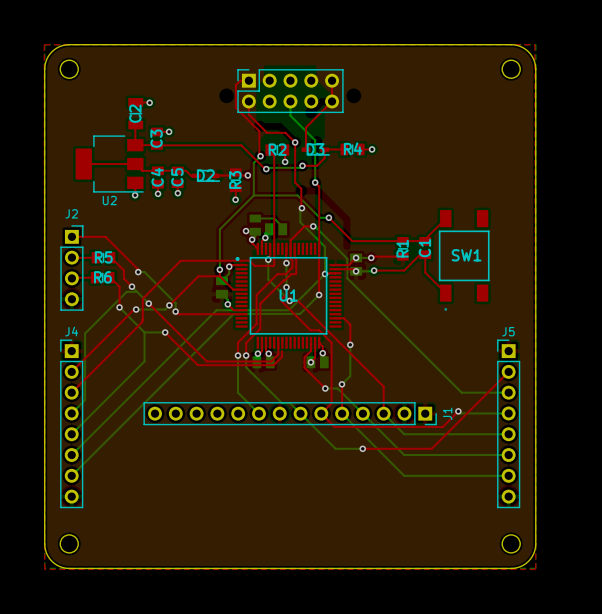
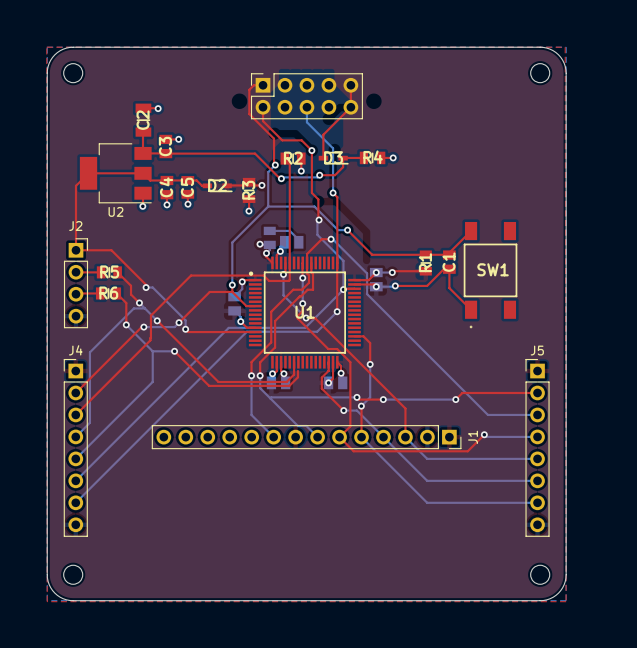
top track: none -> (88, 173) (76, 185) (76, 250)
top track: (508, 371) (431, 448) (362, 448) -> (537, 392) (462, 392) (455, 399)
top track: none -> (356, 397) (359, 399) (383, 399)
bottom track: none -> (356, 397) (270, 398)
via: none -> (356, 397)
bottom track: none -> (383, 399) (455, 399)
via: none -> (383, 399)
via: none -> (455, 399)
bottom track: (300, 413) (335, 448) (362, 448) -> none
via: (362, 448) -> none

